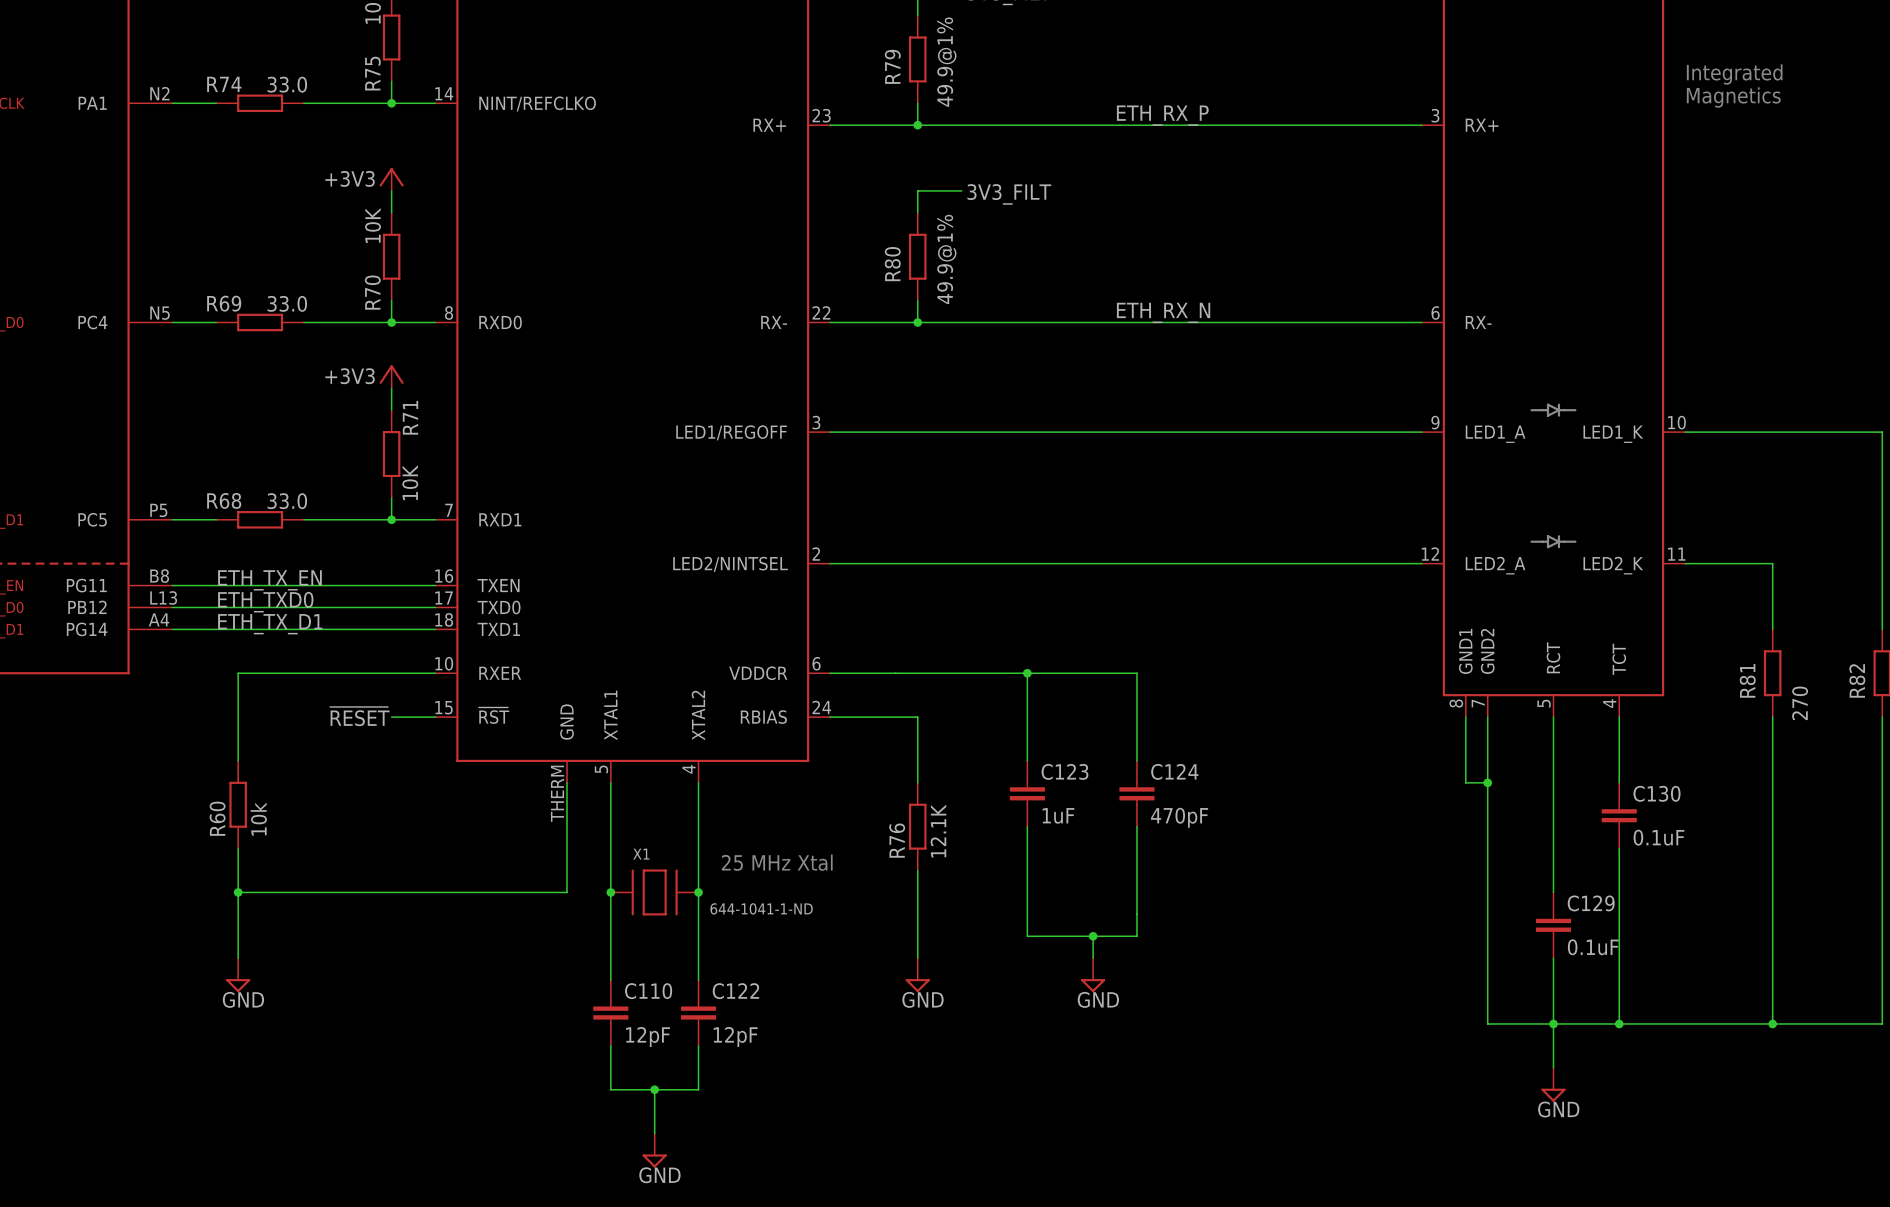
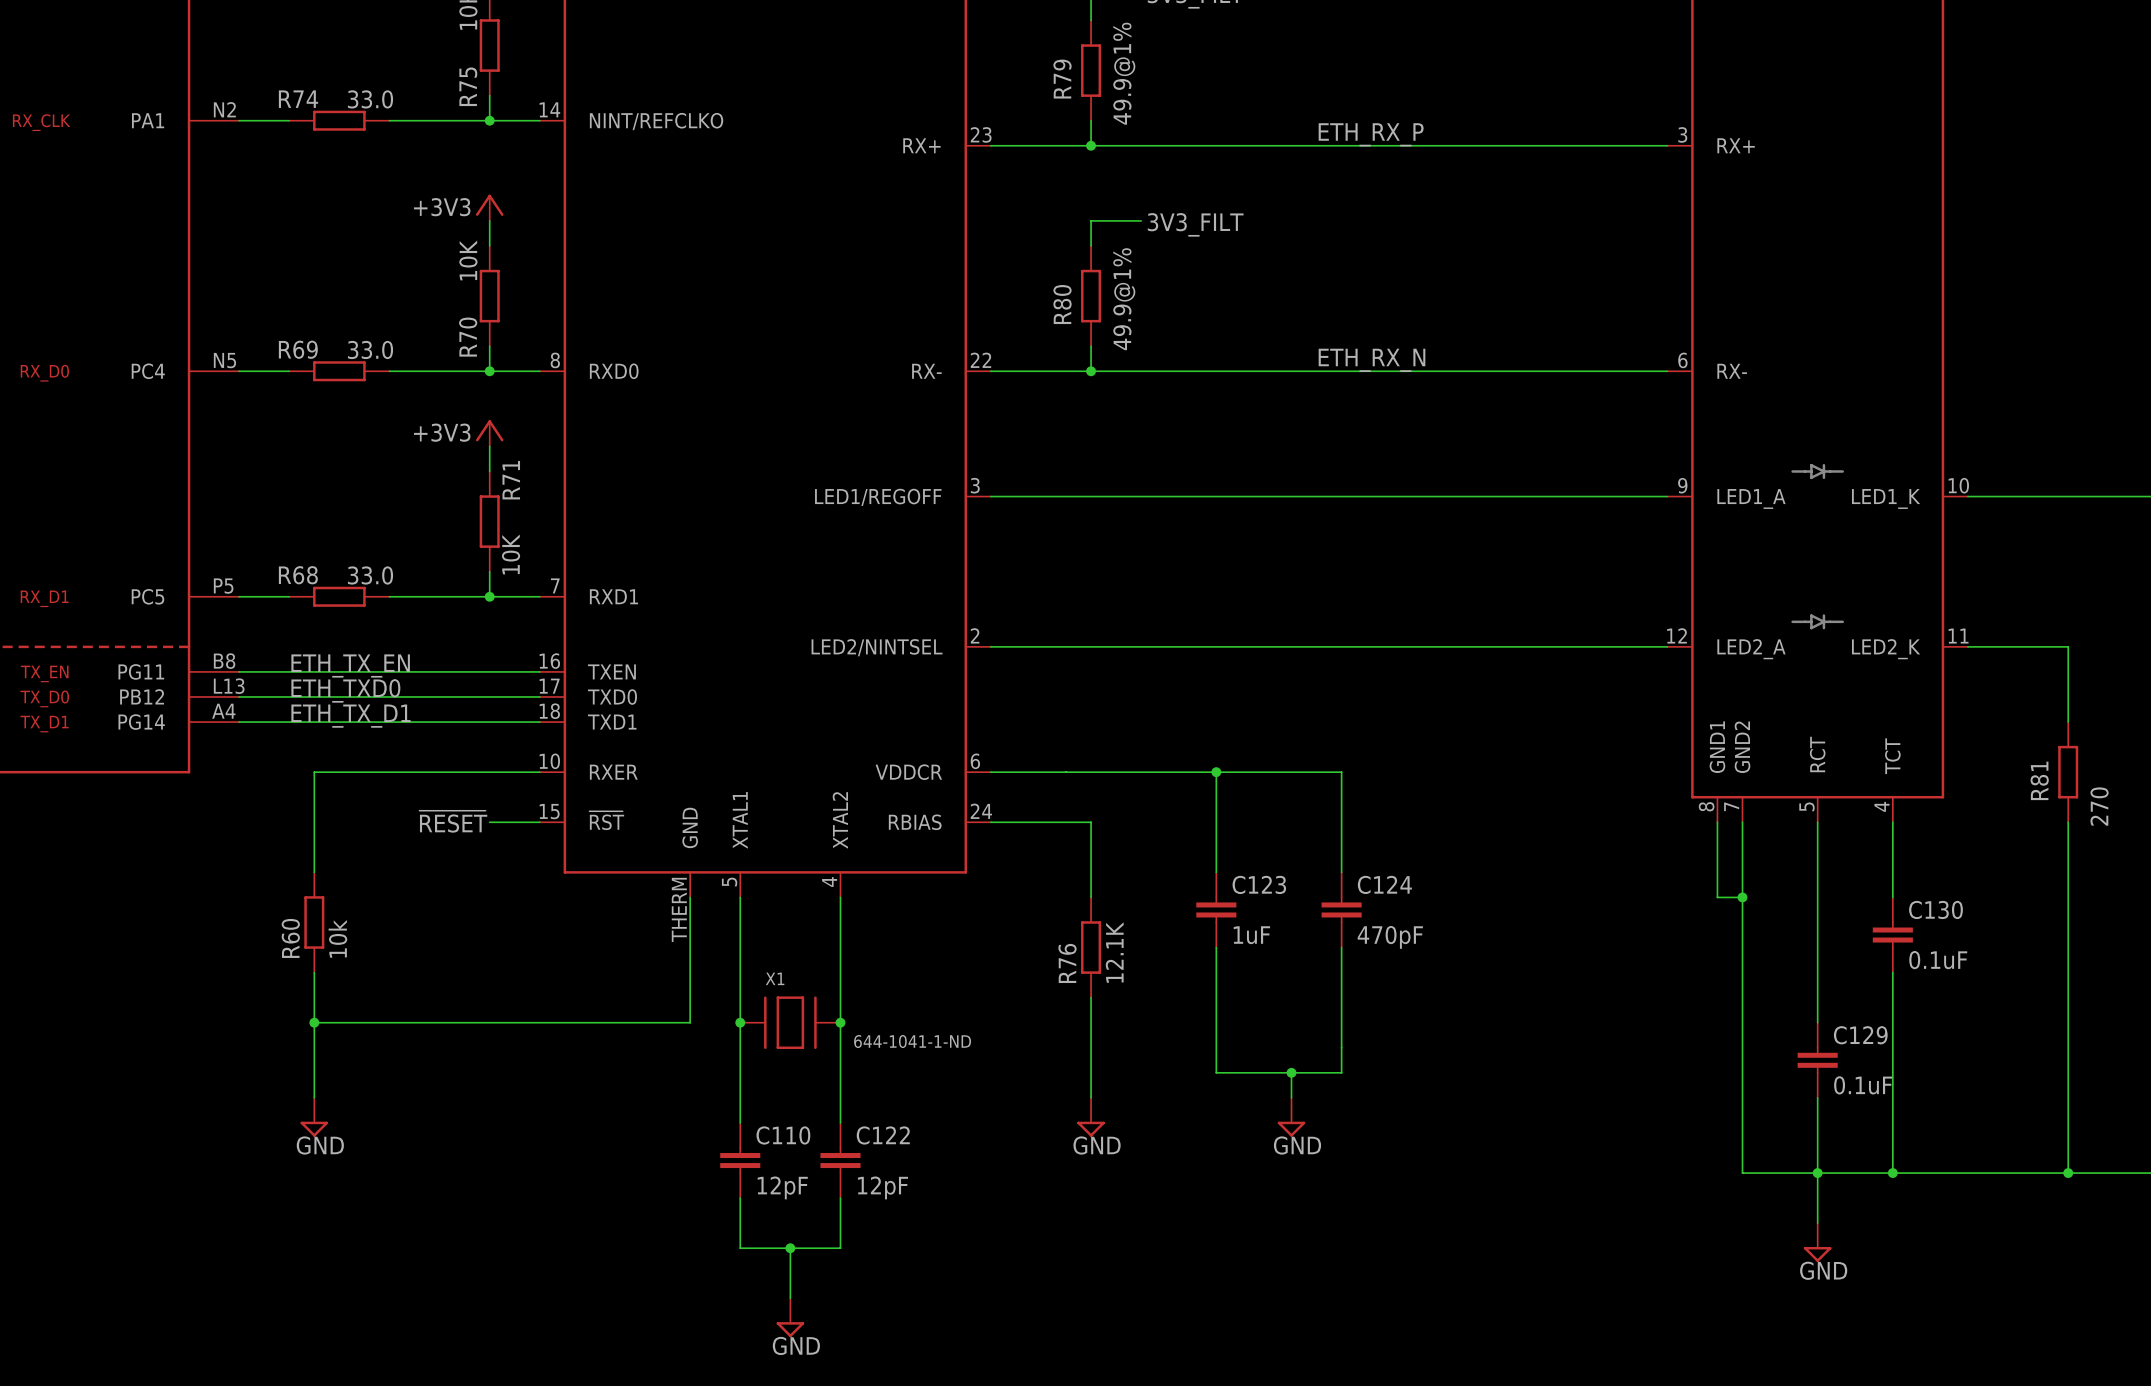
text: Integrated (1734, 74) -> none
text: Magnetics (1733, 97) -> none
text: 25 MHz Xtal (777, 862) -> none

